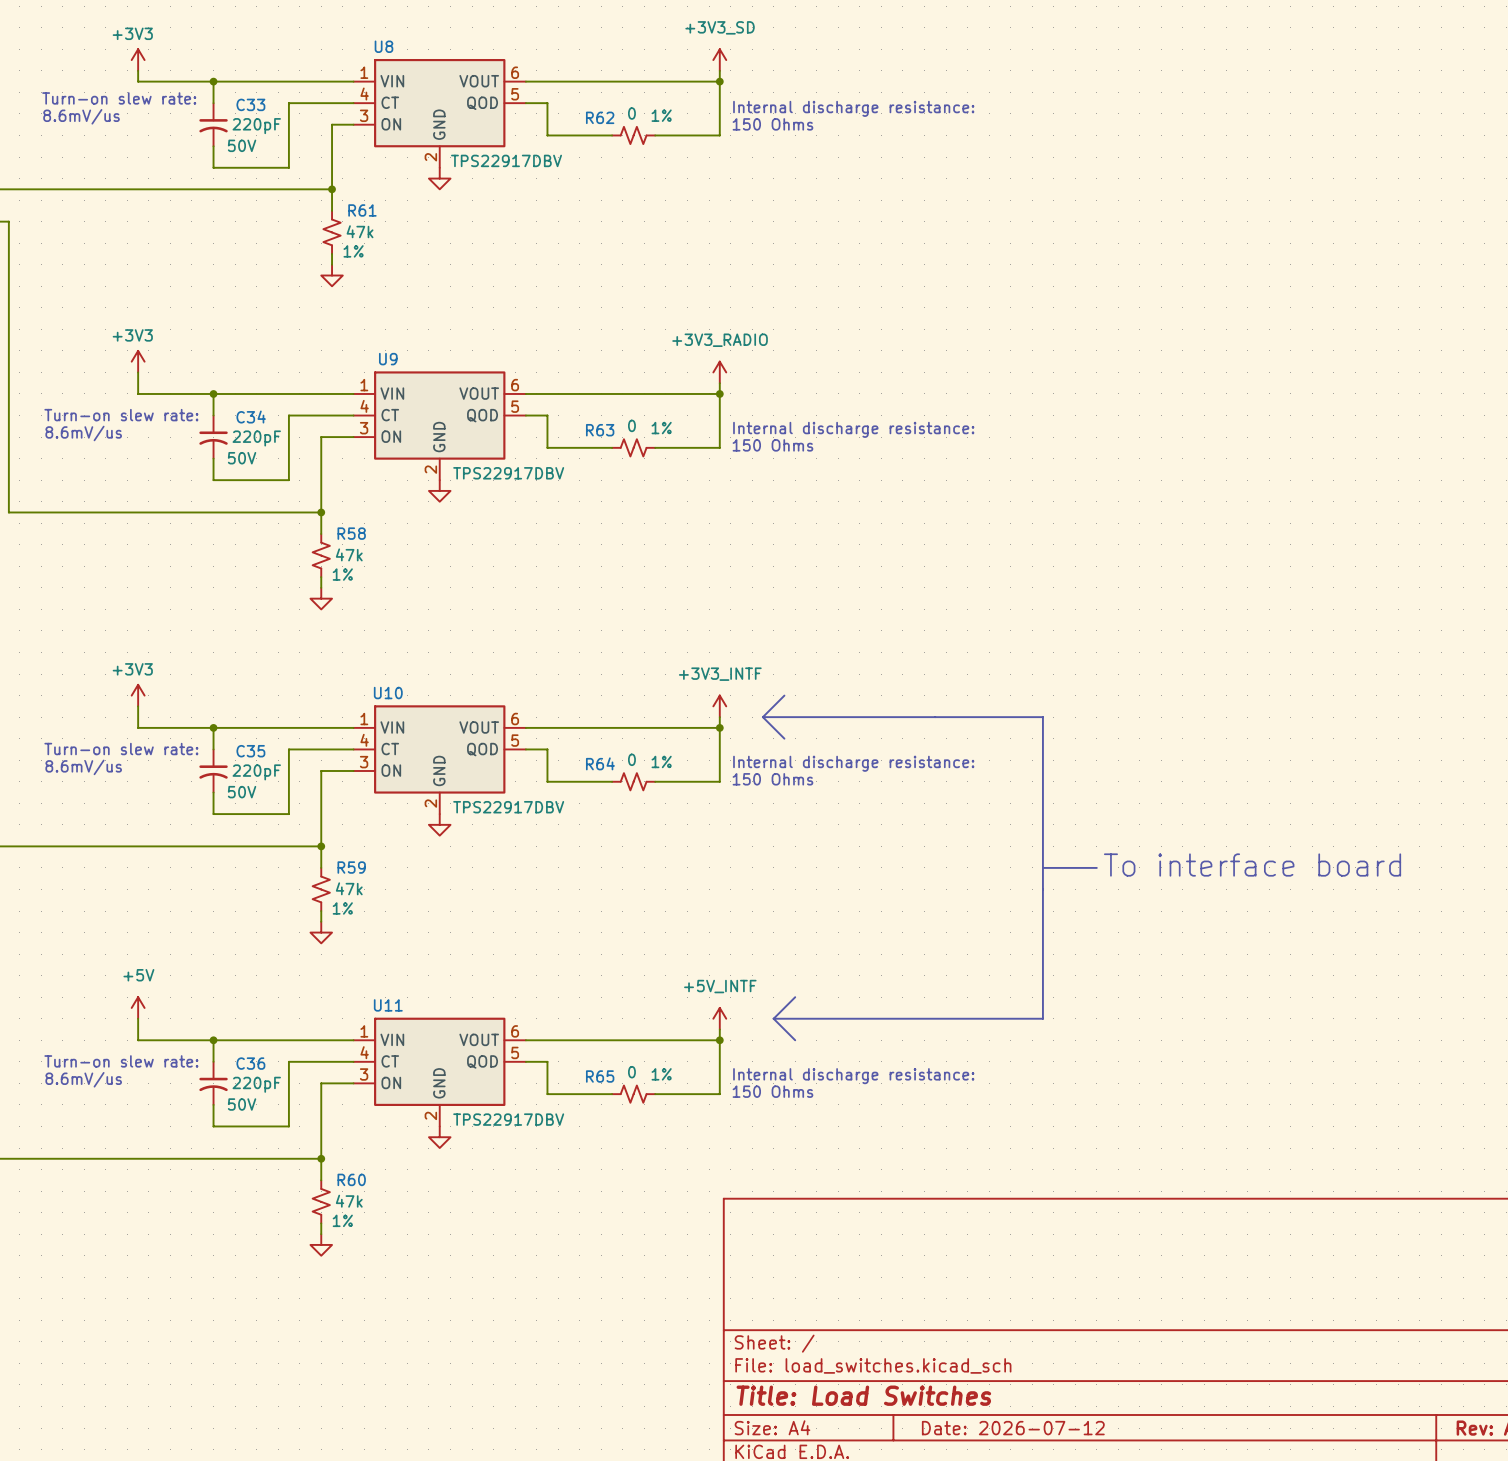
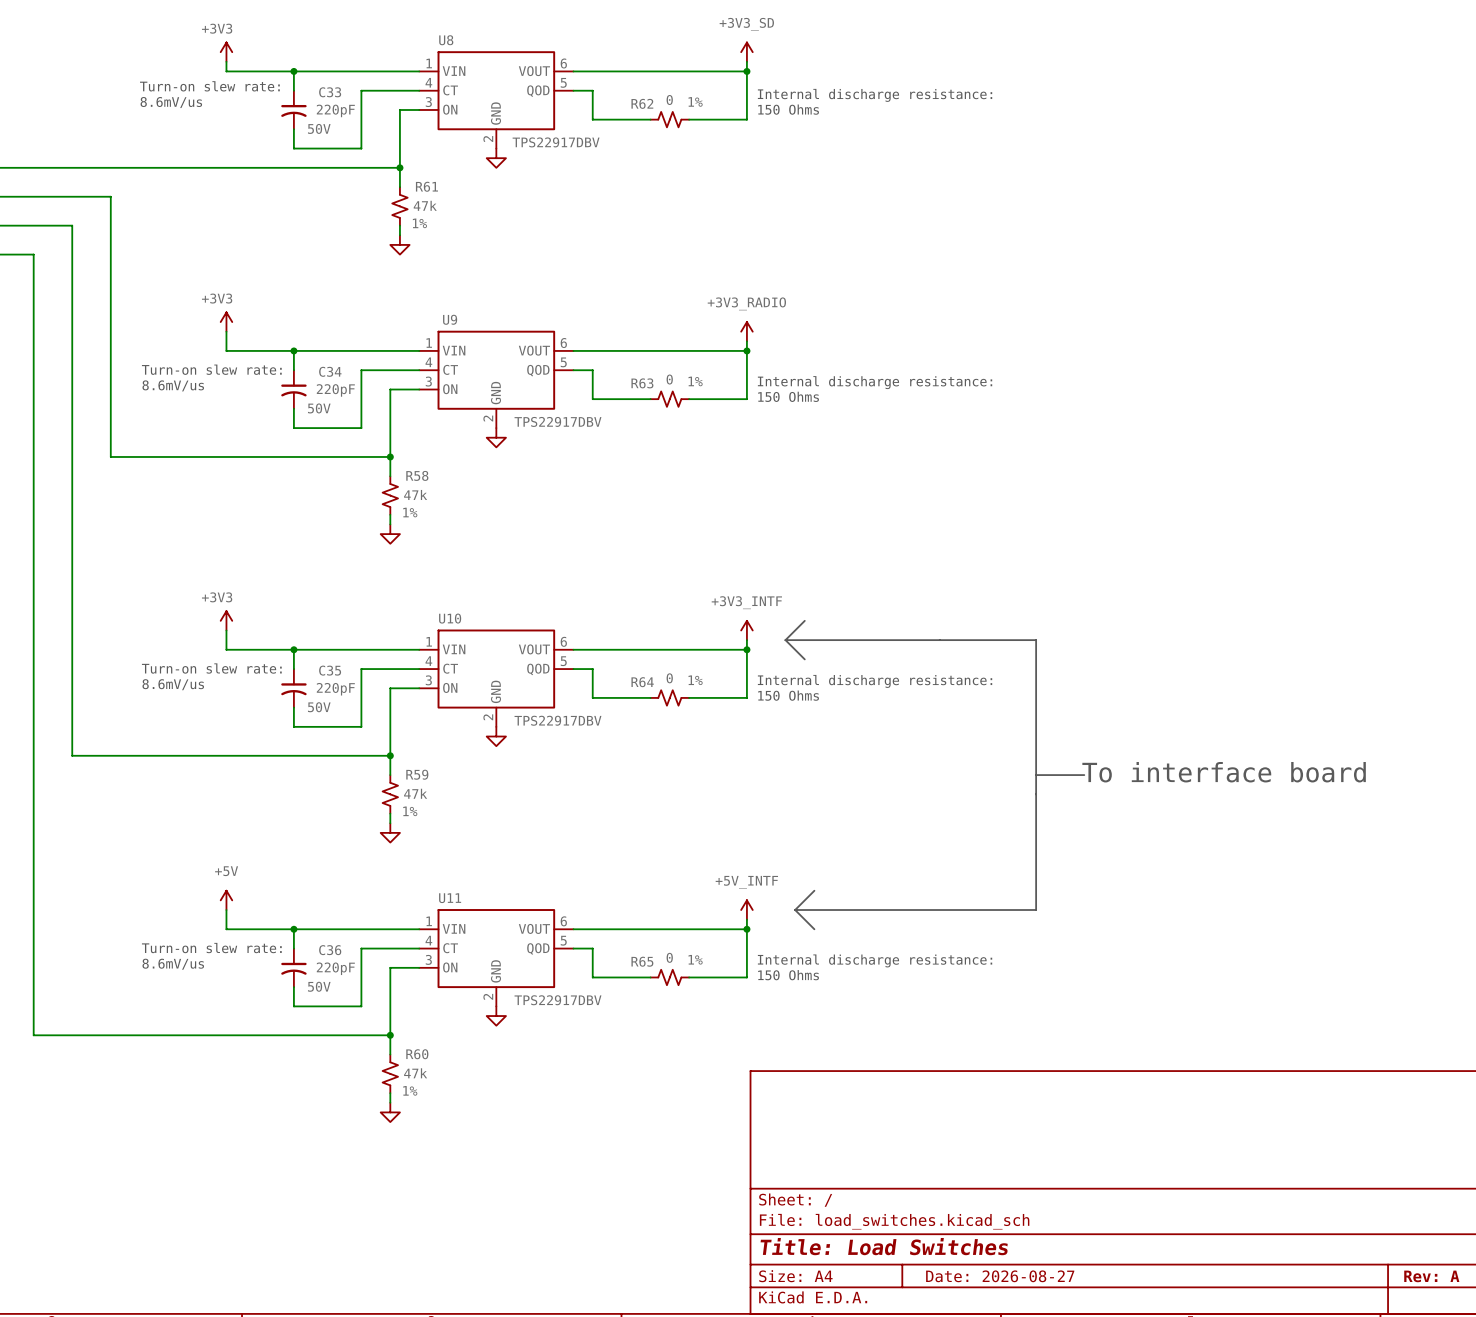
title block: Date: 2026-07-12 (1013, 1428) -> Date: 2026-08-27 (1000, 1276)

